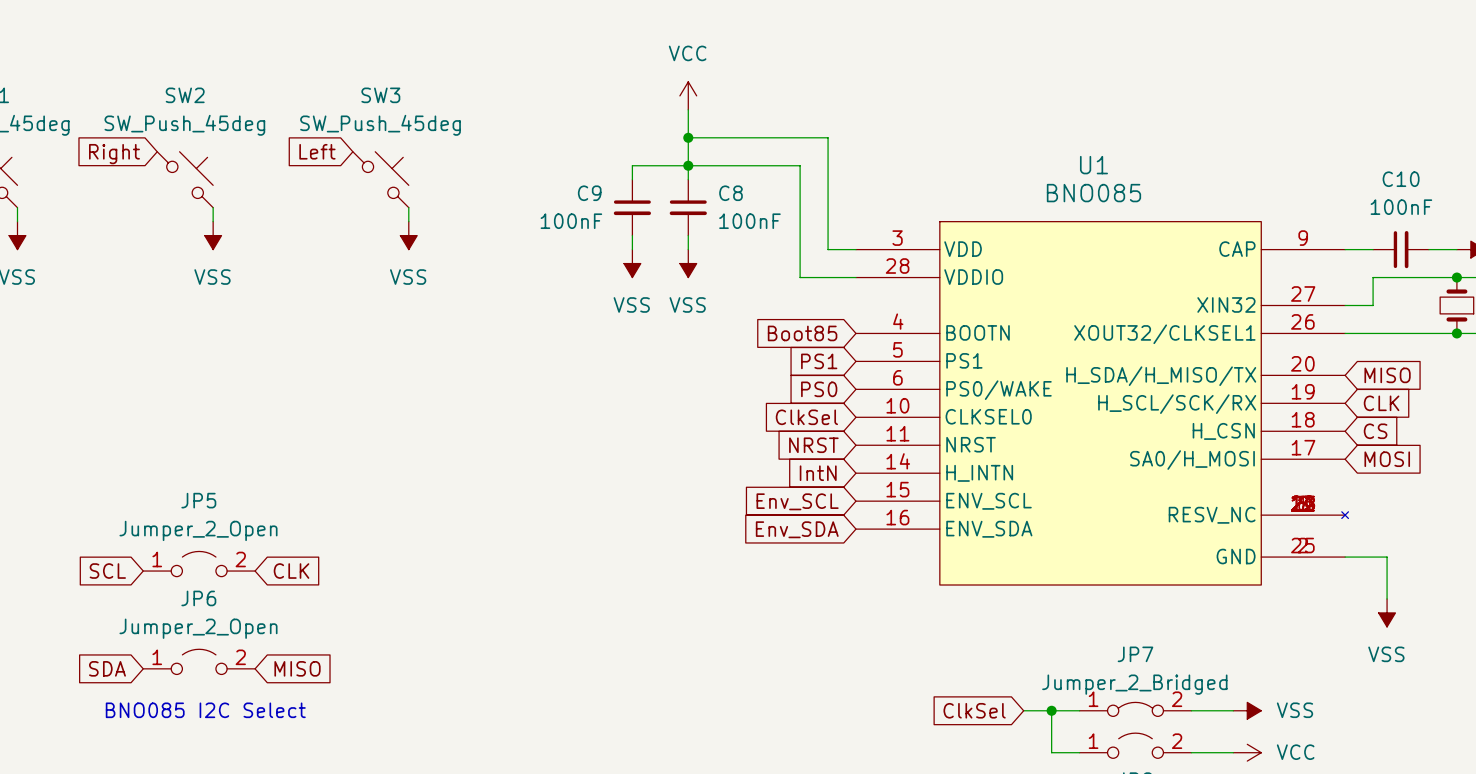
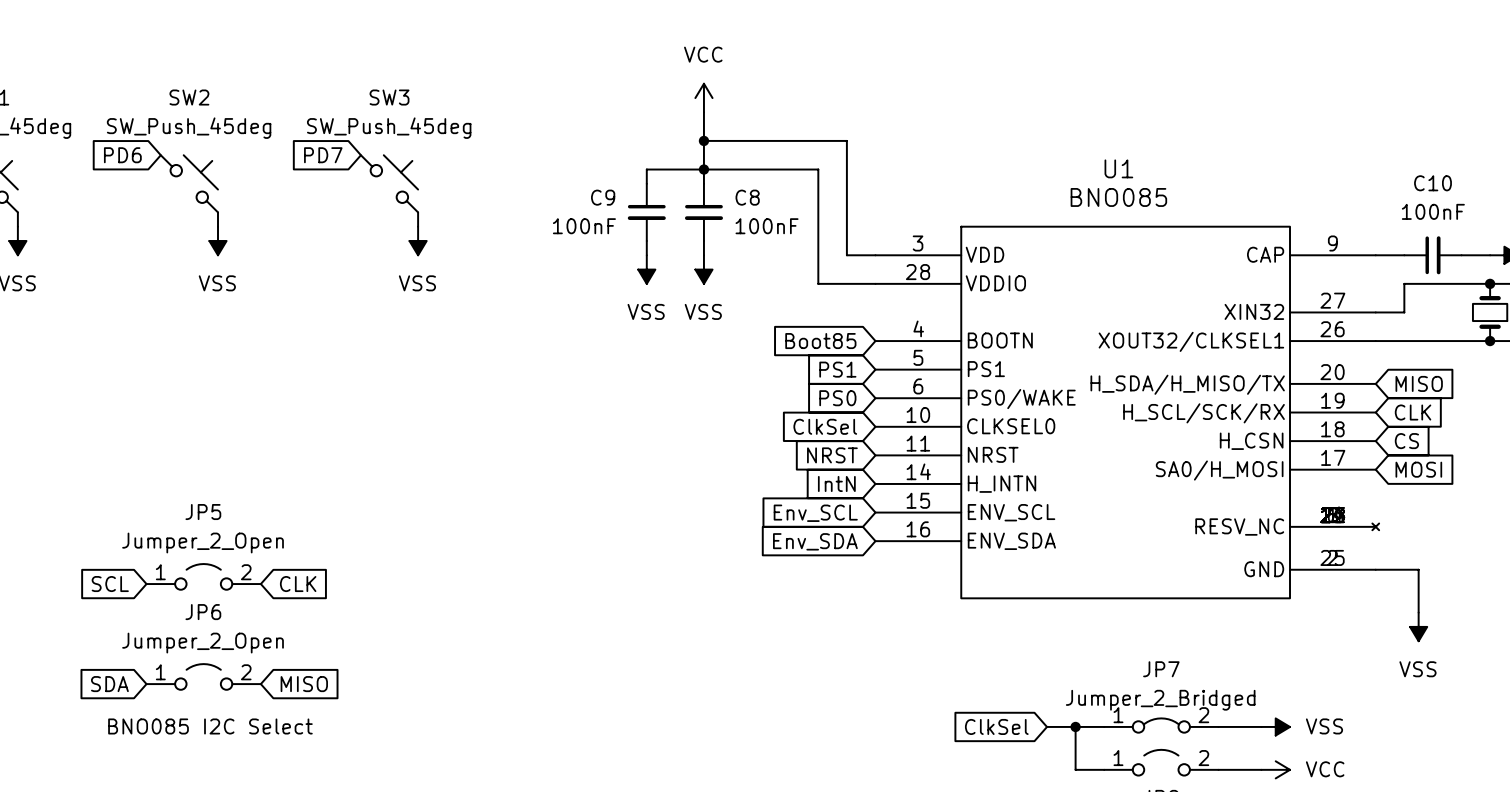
global label: Left (317, 151) -> PD7 (323, 155)
global label: Right (114, 154) -> PD6 (122, 155)

